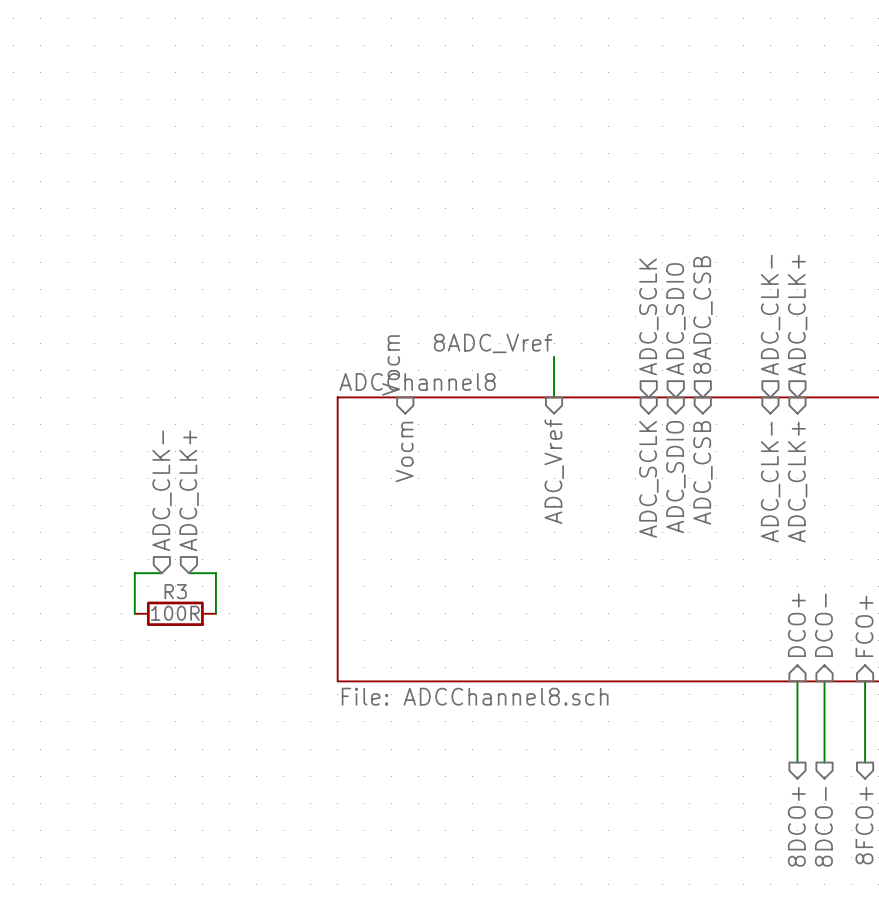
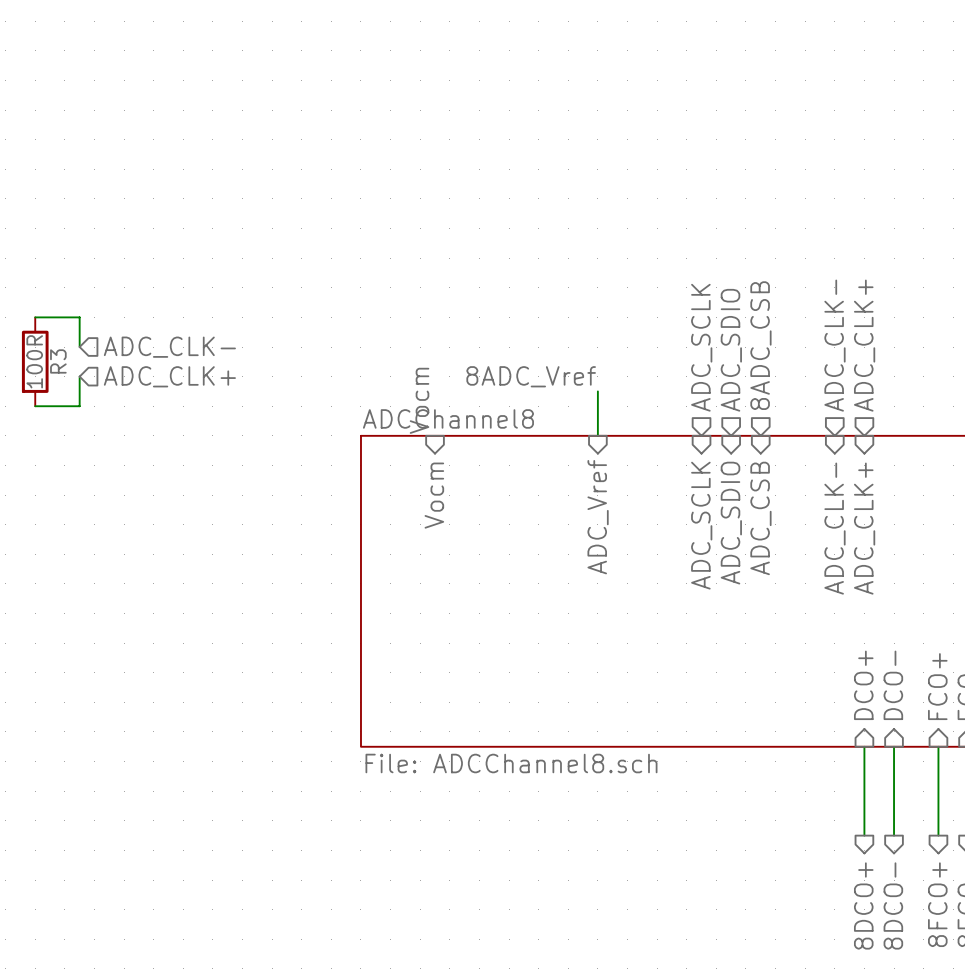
wire: none -> (35, 317) (79, 317) (79, 347)
wire: none -> (79, 376) (79, 406) (35, 406)
hierarchical label rotation: 0° (162, 490) -> 90° clockwise (169, 347)
hierarchical label position: ADC_CLK- (162, 490) -> ADC_CLK- (169, 347)
hierarchical label rotation: 0° (189, 490) -> 90° clockwise (169, 376)
wire: (161, 573) (134, 573) (134, 613) -> none
wire: (188, 573) (215, 573) (215, 613) -> none
R3 rotation: 0° (175, 613) -> 90° clockwise (35, 361)
R3 position: (175, 613) -> (35, 361)

